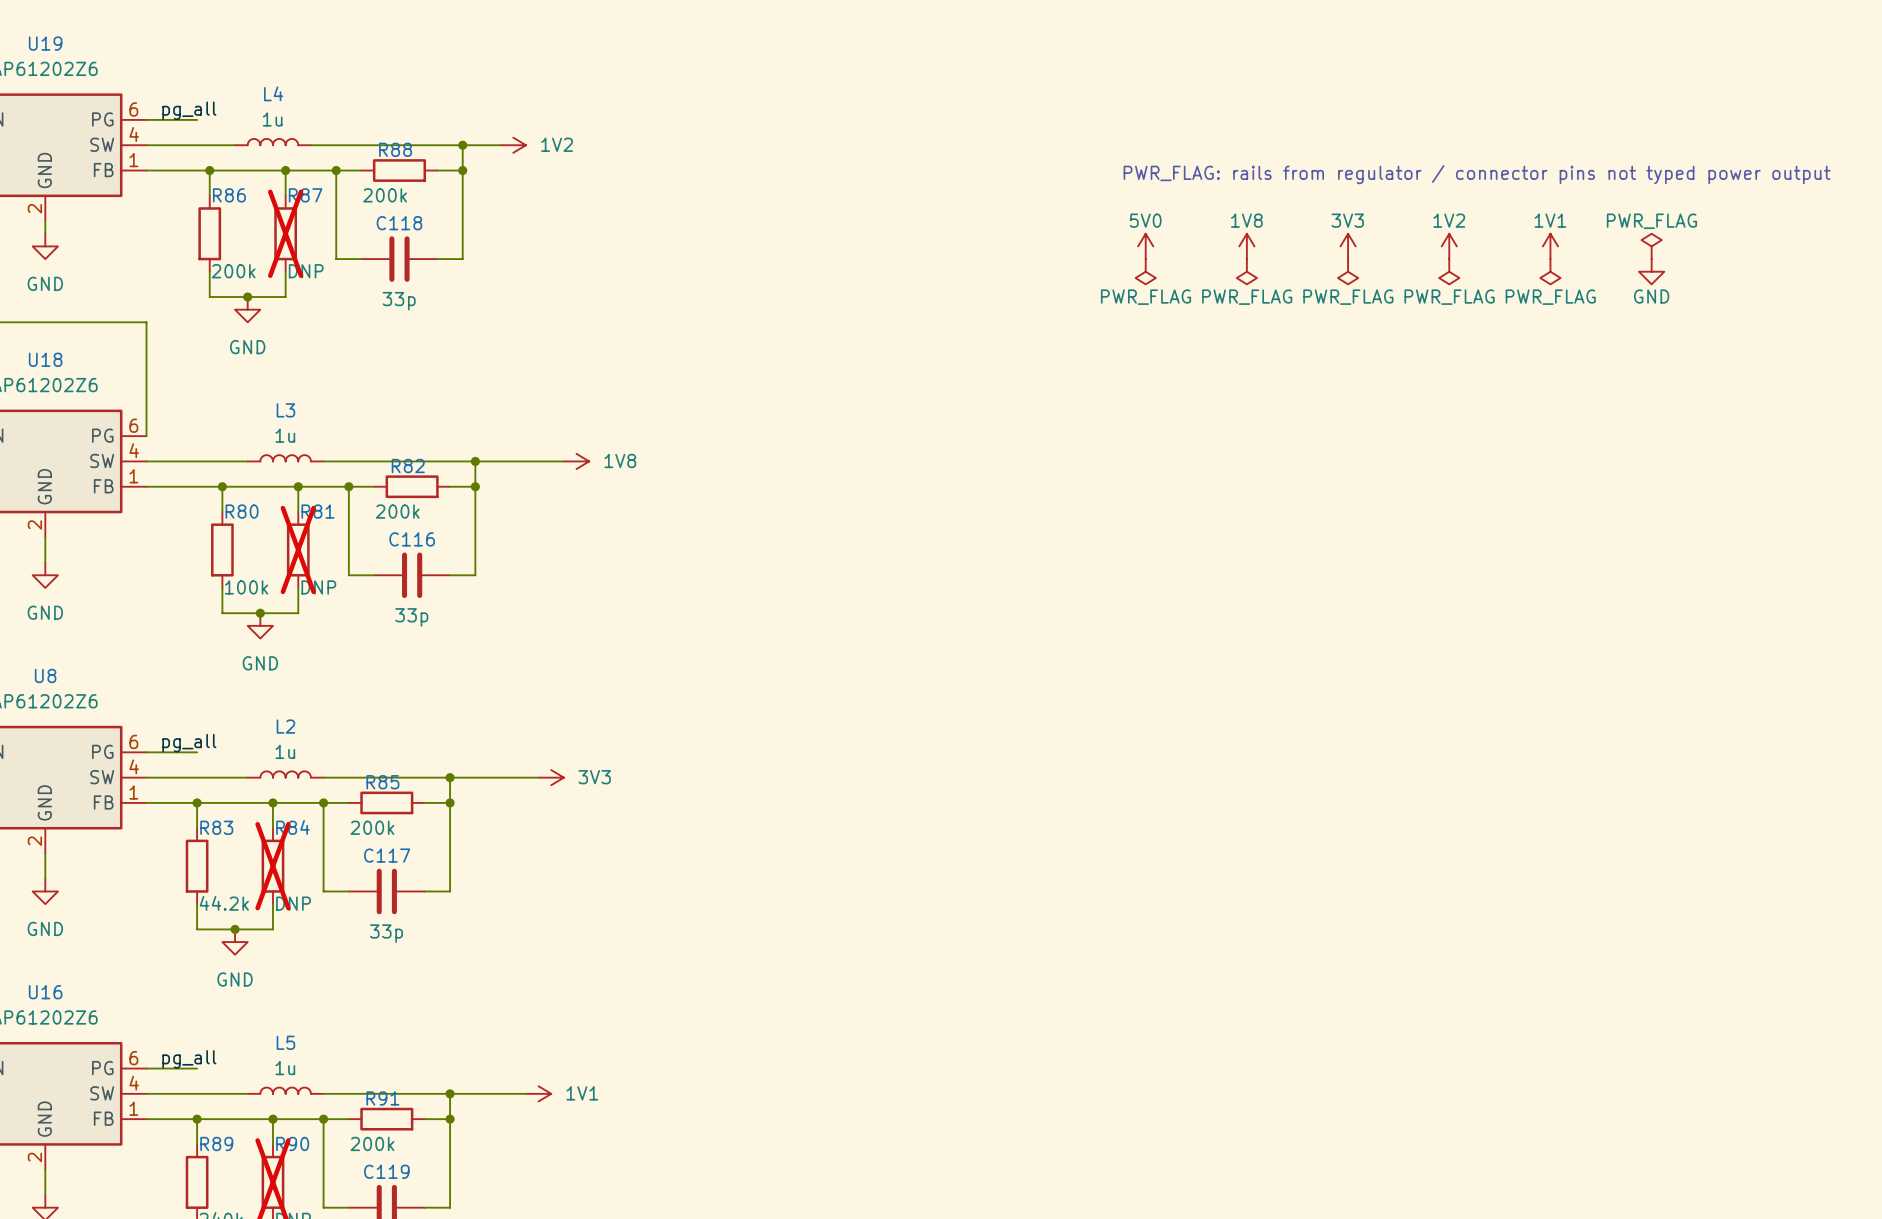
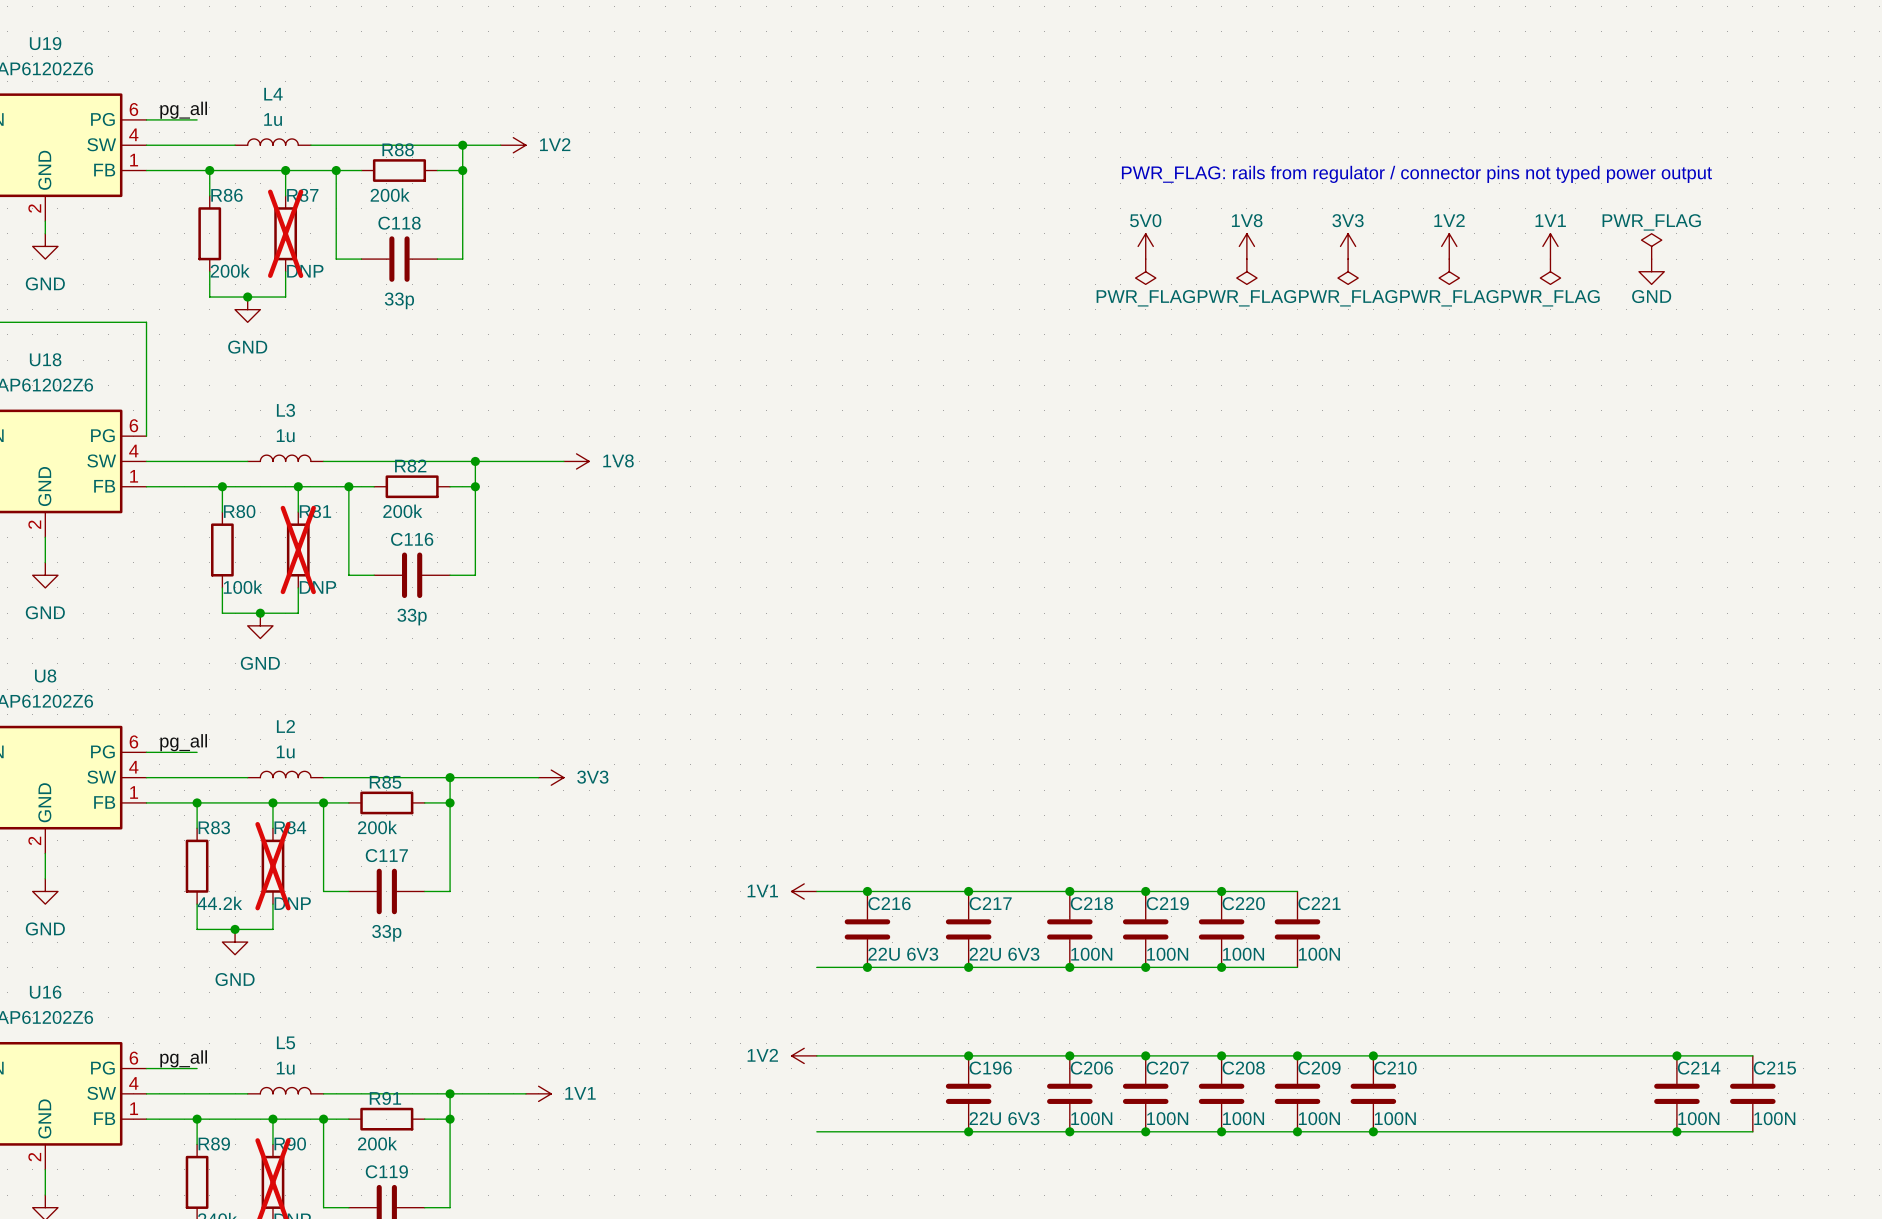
power symbol: none -> 1V1 (804, 891)
wire: none -> (816, 891) (1297, 891)
junction: none -> (867, 891)
junction: none -> (968, 891)
junction: none -> (1069, 891)
junction: none -> (1145, 891)
junction: none -> (1221, 891)
C216: none -> 22U 6V3 (867, 929)
C217: none -> 22U 6V3 (968, 929)
C218: none -> 100N (1069, 929)
C219: none -> 100N (1145, 929)
C220: none -> 100N (1221, 929)
C221: none -> 100N (1297, 929)
wire: none -> (816, 967) (1297, 967)
junction: none -> (867, 967)
junction: none -> (968, 967)
junction: none -> (1069, 967)
junction: none -> (1145, 967)
junction: none -> (1221, 967)
power symbol: none -> 1V2 (804, 1055)
wire: none -> (816, 1055) (1752, 1055)
junction: none -> (968, 1055)
junction: none -> (1069, 1055)
junction: none -> (1145, 1055)
junction: none -> (1221, 1055)
junction: none -> (1297, 1055)
junction: none -> (1373, 1055)
junction: none -> (1676, 1055)
C196: none -> 22U 6V3 (968, 1093)
C206: none -> 100N (1069, 1093)
C207: none -> 100N (1145, 1093)
C208: none -> 100N (1221, 1093)
C209: none -> 100N (1297, 1093)
C210: none -> 100N (1373, 1093)
C214: none -> 100N (1676, 1093)
C215: none -> 100N (1752, 1093)
wire: none -> (816, 1131) (1752, 1131)
junction: none -> (968, 1131)
junction: none -> (1069, 1131)
junction: none -> (1145, 1131)
junction: none -> (1221, 1131)
junction: none -> (1297, 1131)
junction: none -> (1373, 1131)
junction: none -> (1676, 1131)

